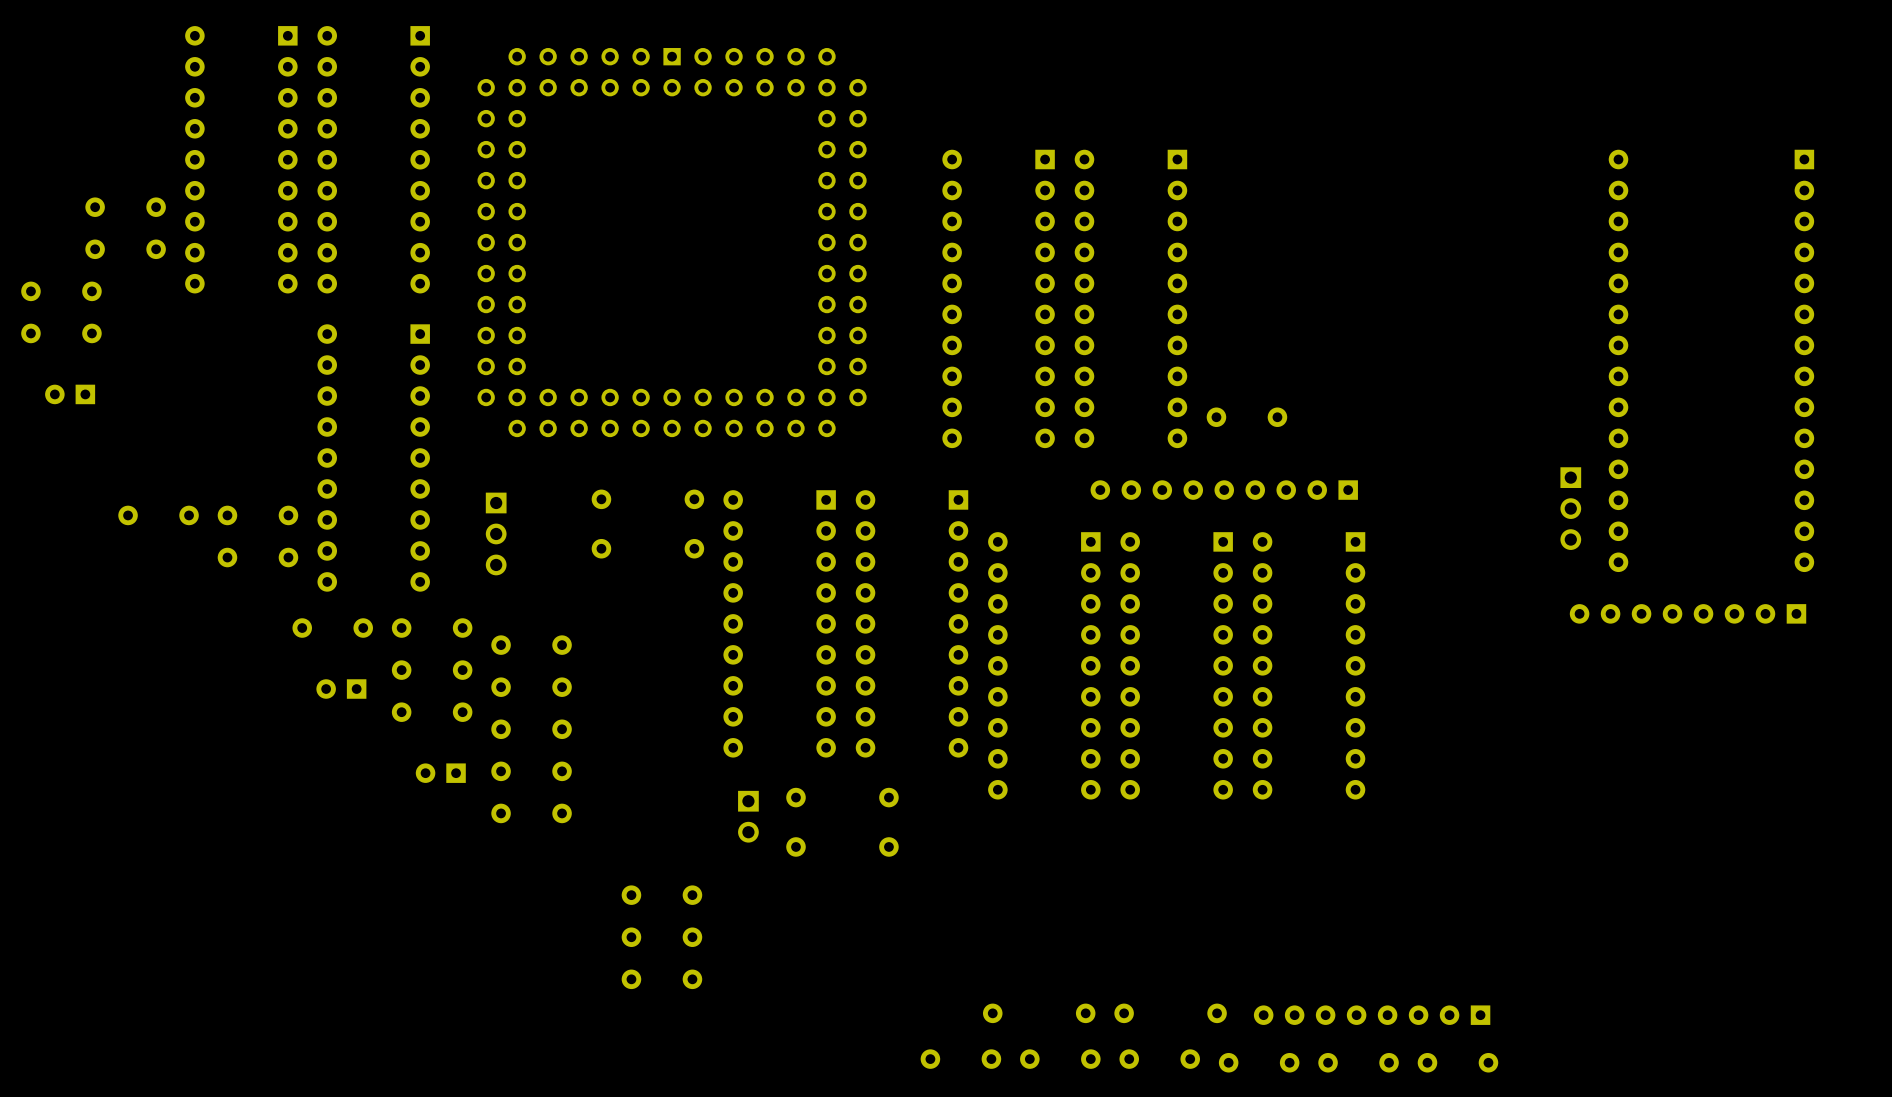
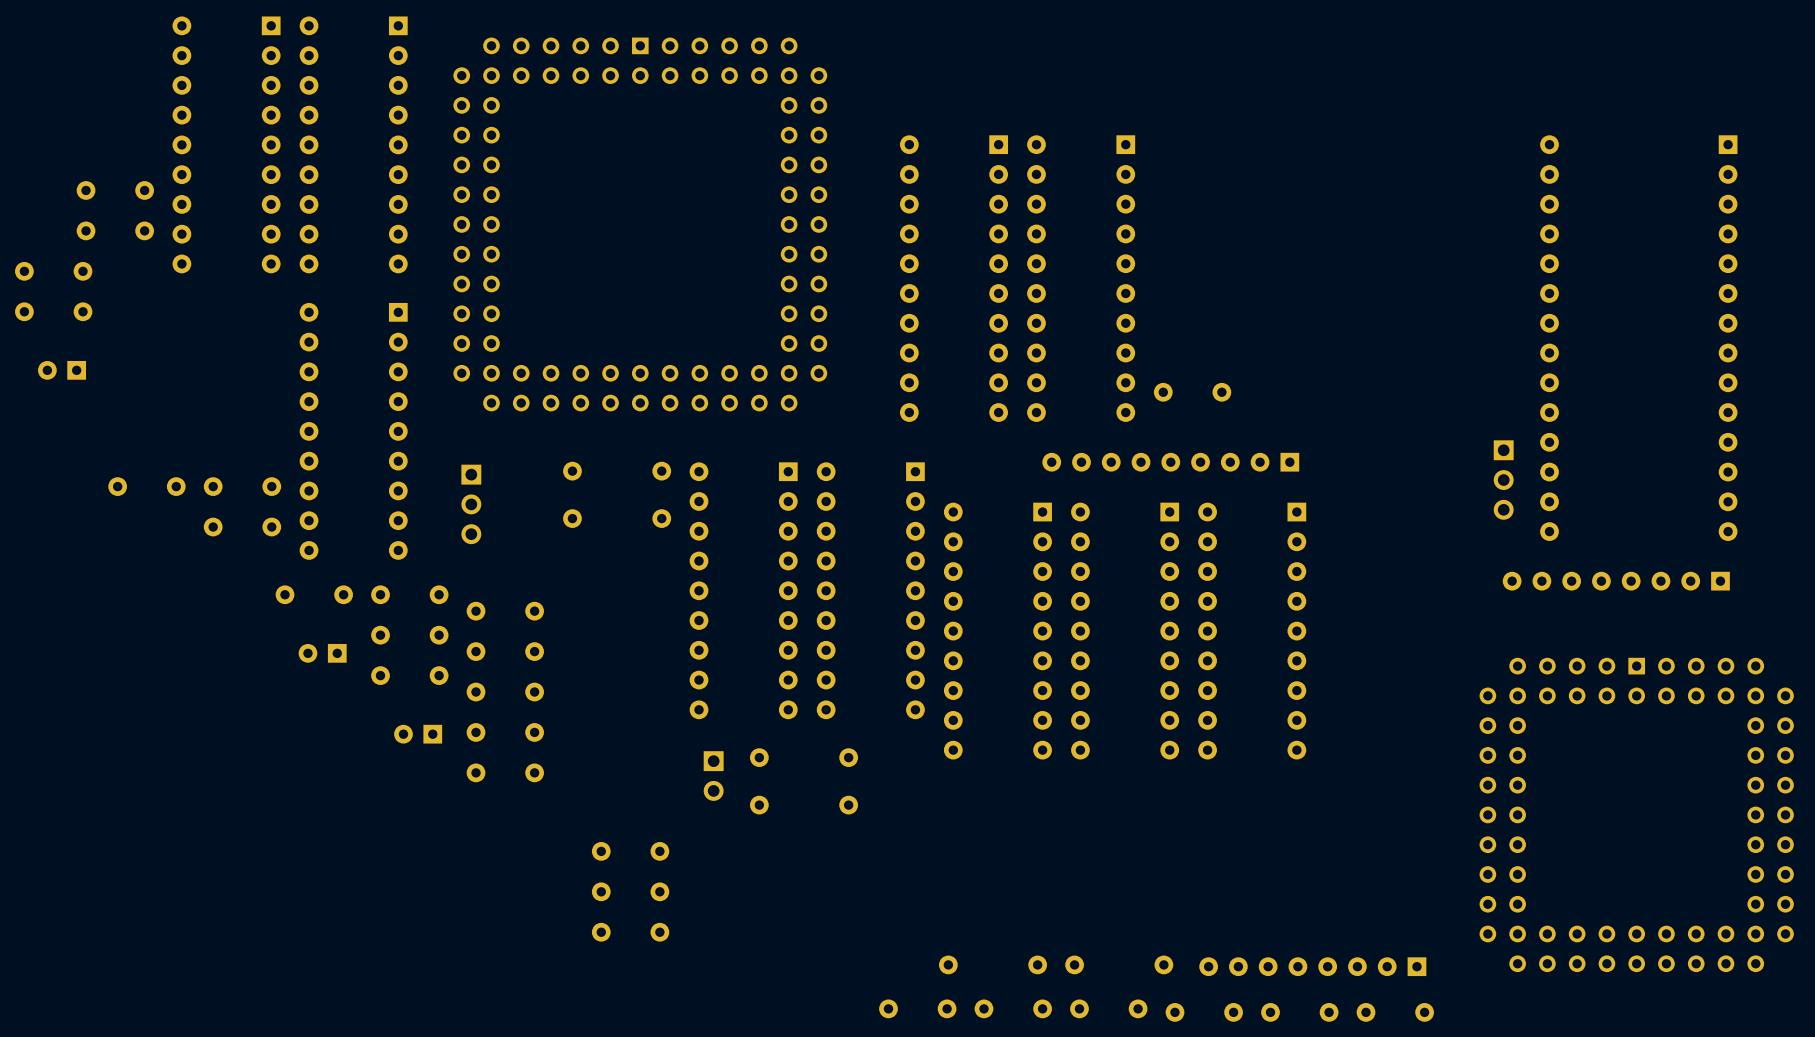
part: none -> (1636, 814)

